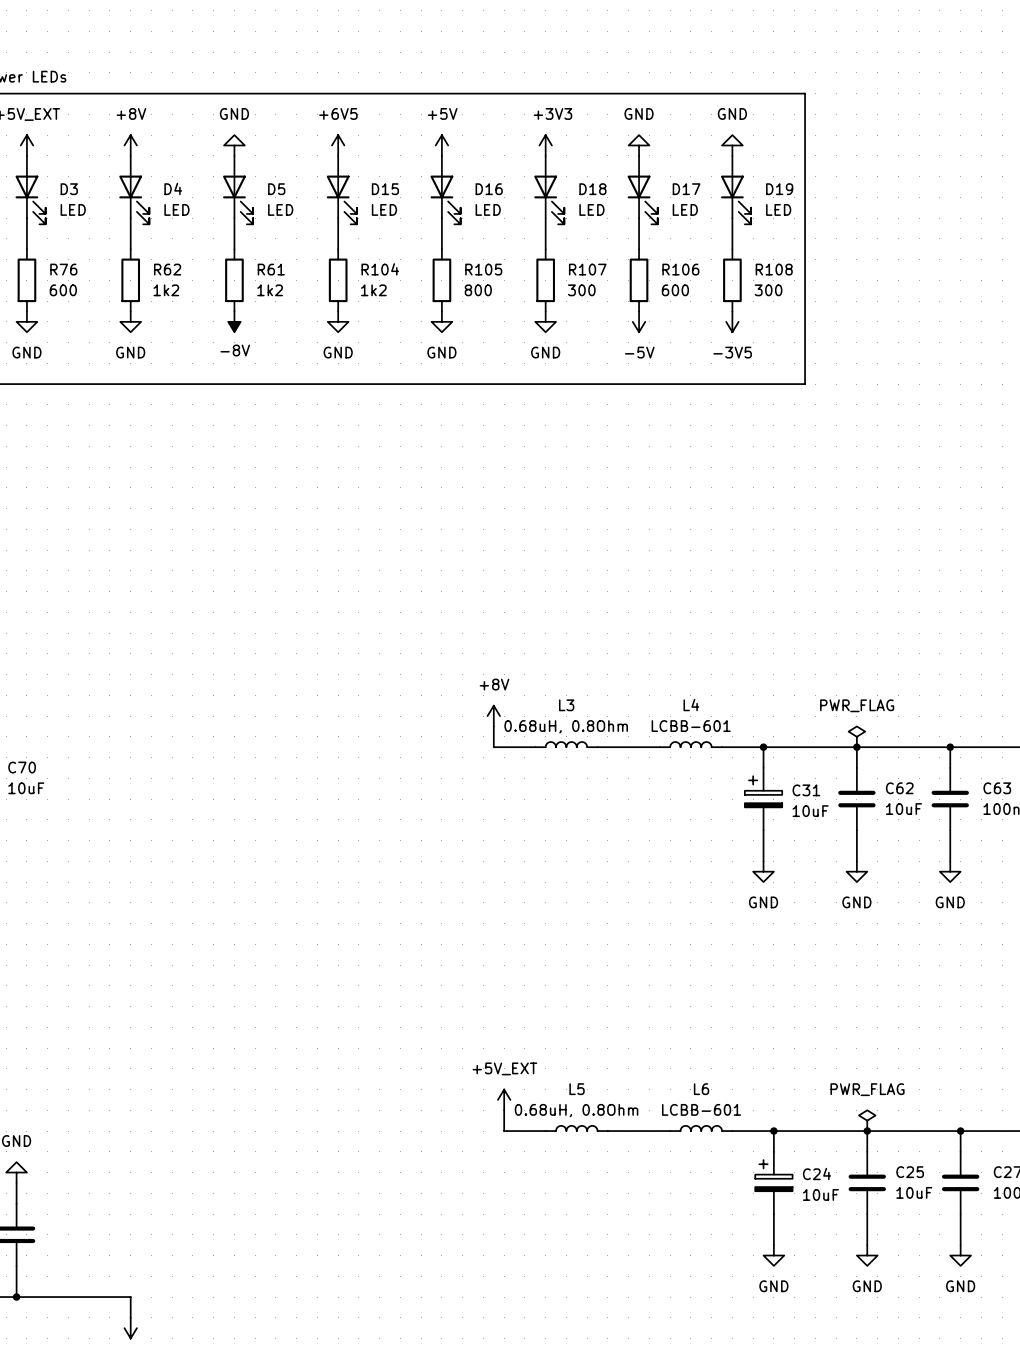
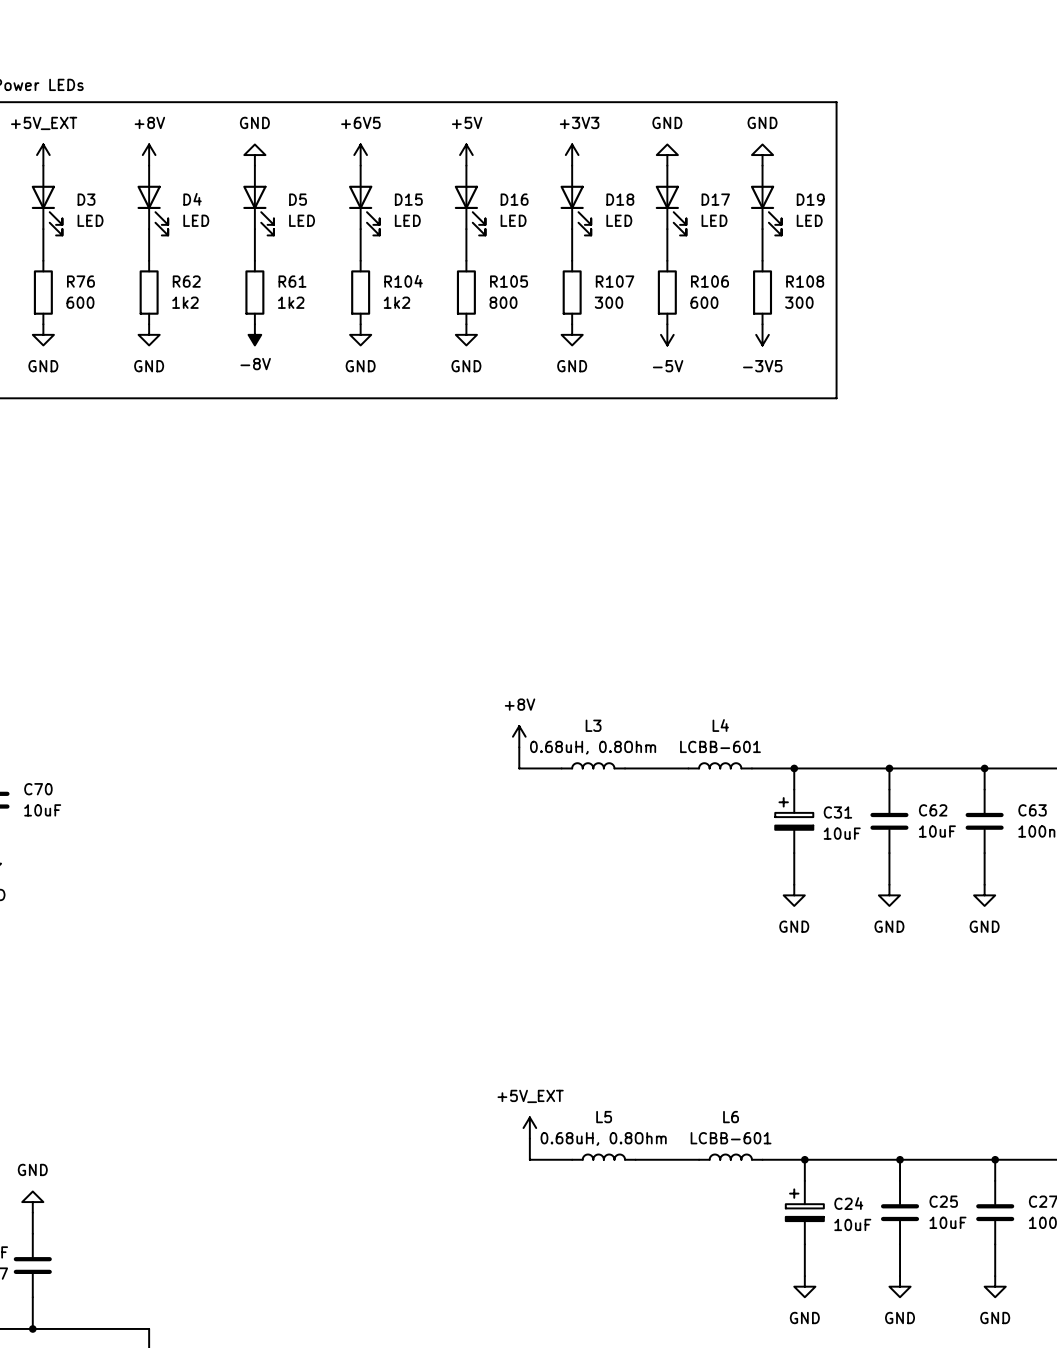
power symbol: PWR_FLAG (856, 736) -> none
power symbol: PWR_FLAG (867, 1120) -> none

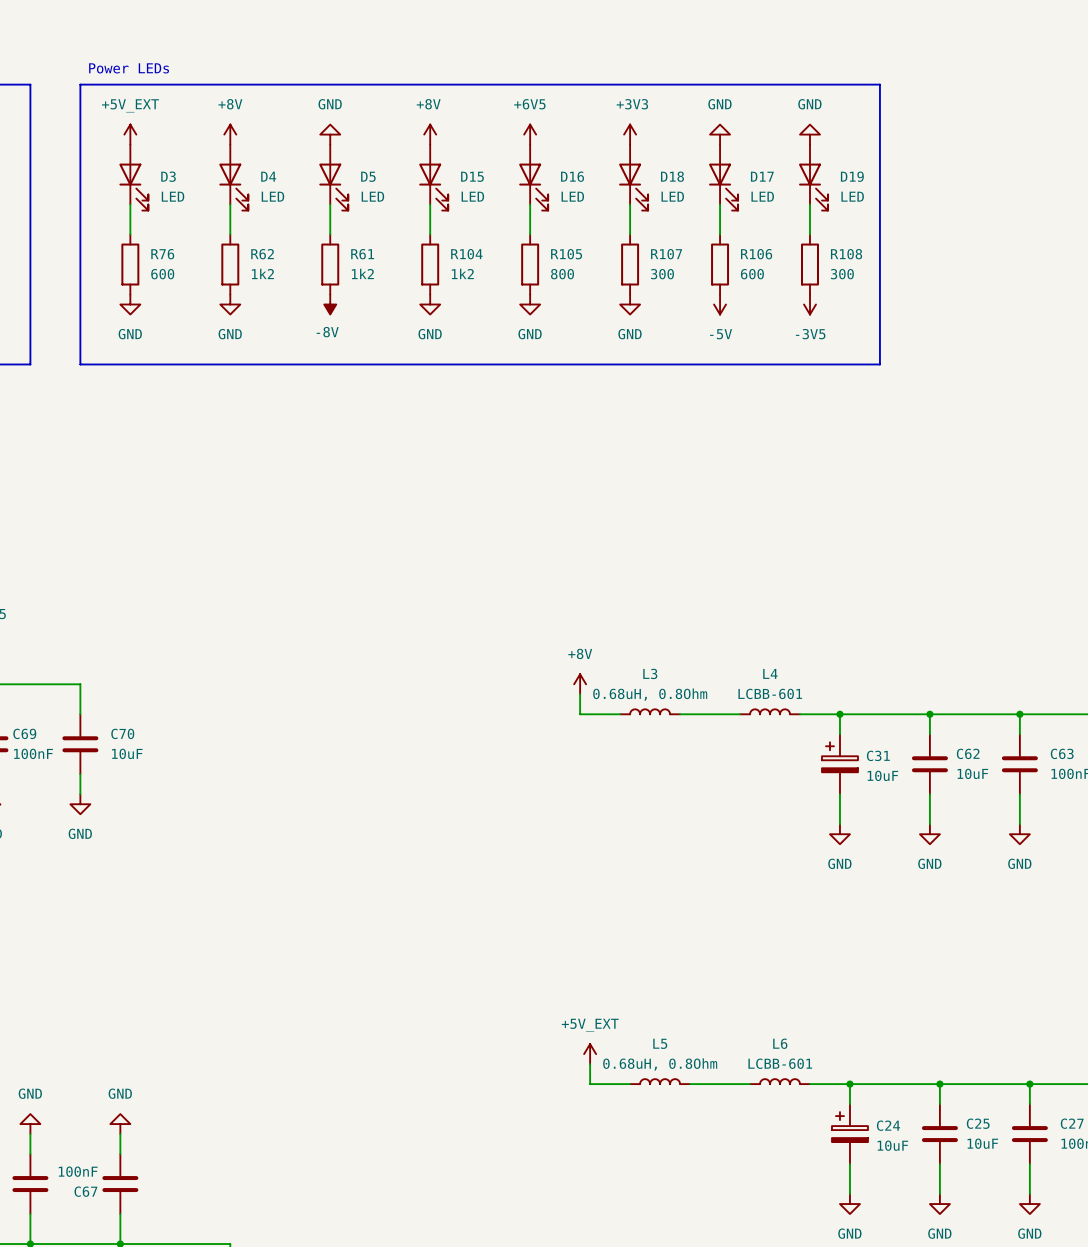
power symbol: +6V5 (360, 155) -> +8V (430, 134)
power symbol: +5V (466, 155) -> +6V5 (530, 134)

